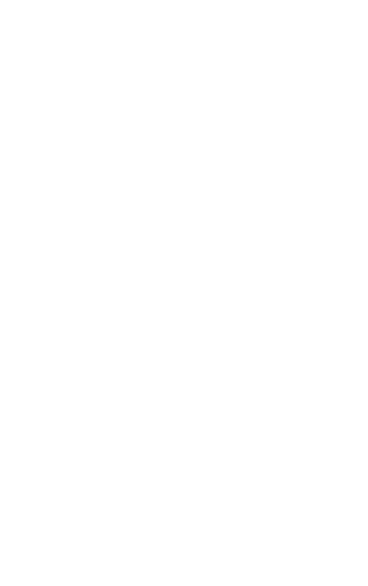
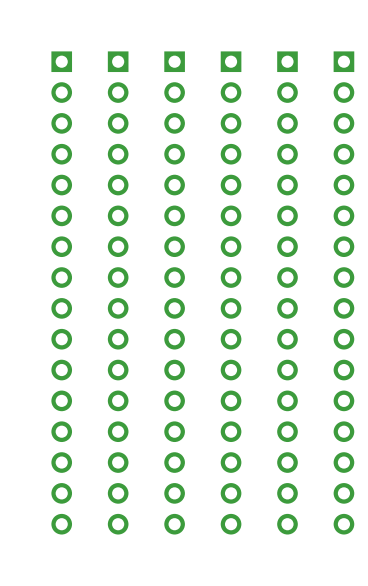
part: none -> (61, 292)
part: none -> (118, 292)
part: none -> (174, 292)
part: none -> (231, 292)
part: none -> (287, 292)
part: none -> (343, 292)

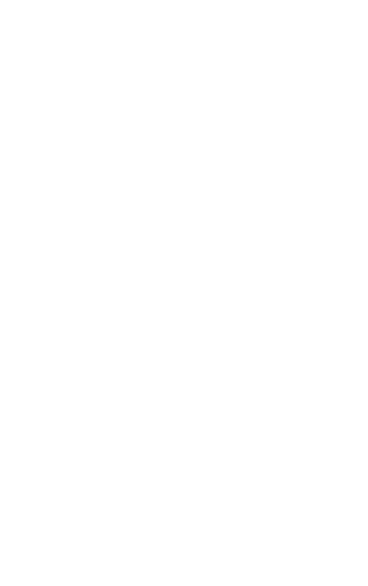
part: (61, 292) -> none
part: (118, 292) -> none
part: (174, 292) -> none
part: (231, 292) -> none
part: (287, 292) -> none
part: (343, 292) -> none

